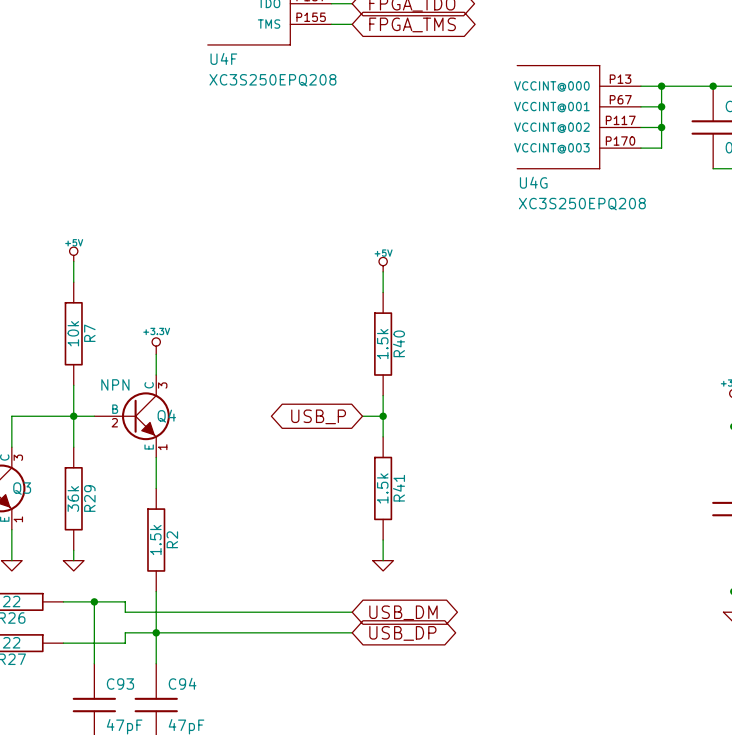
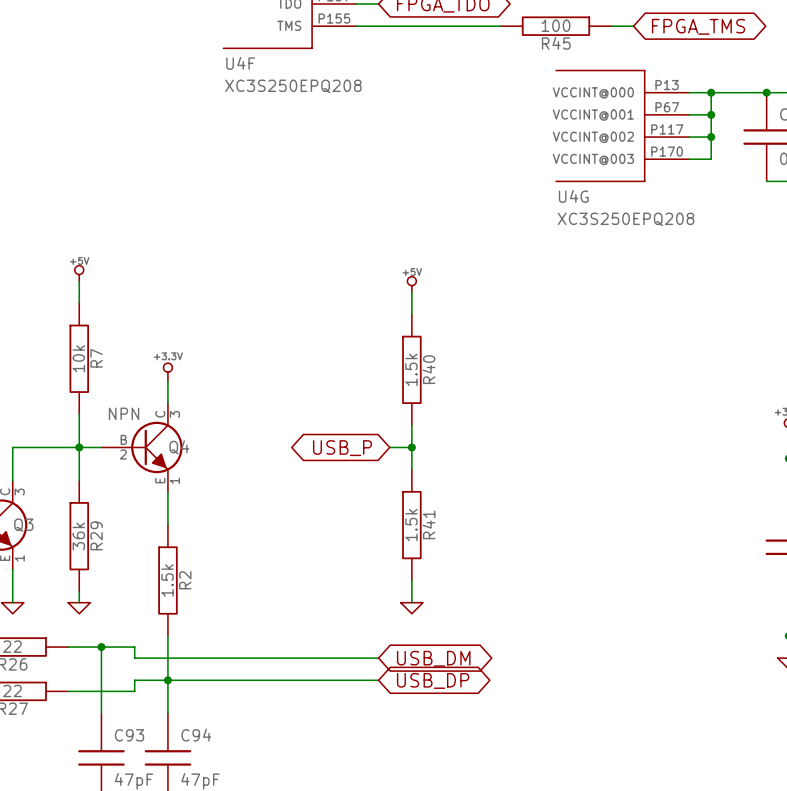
wire: none -> (378, 26) (500, 26)
global label: FPGA_TMS (412, 24) -> none
R45: none -> 100 (555, 26)
wire: none -> (611, 26) (633, 26)
global label: none -> FPGA_TMS (698, 26)

